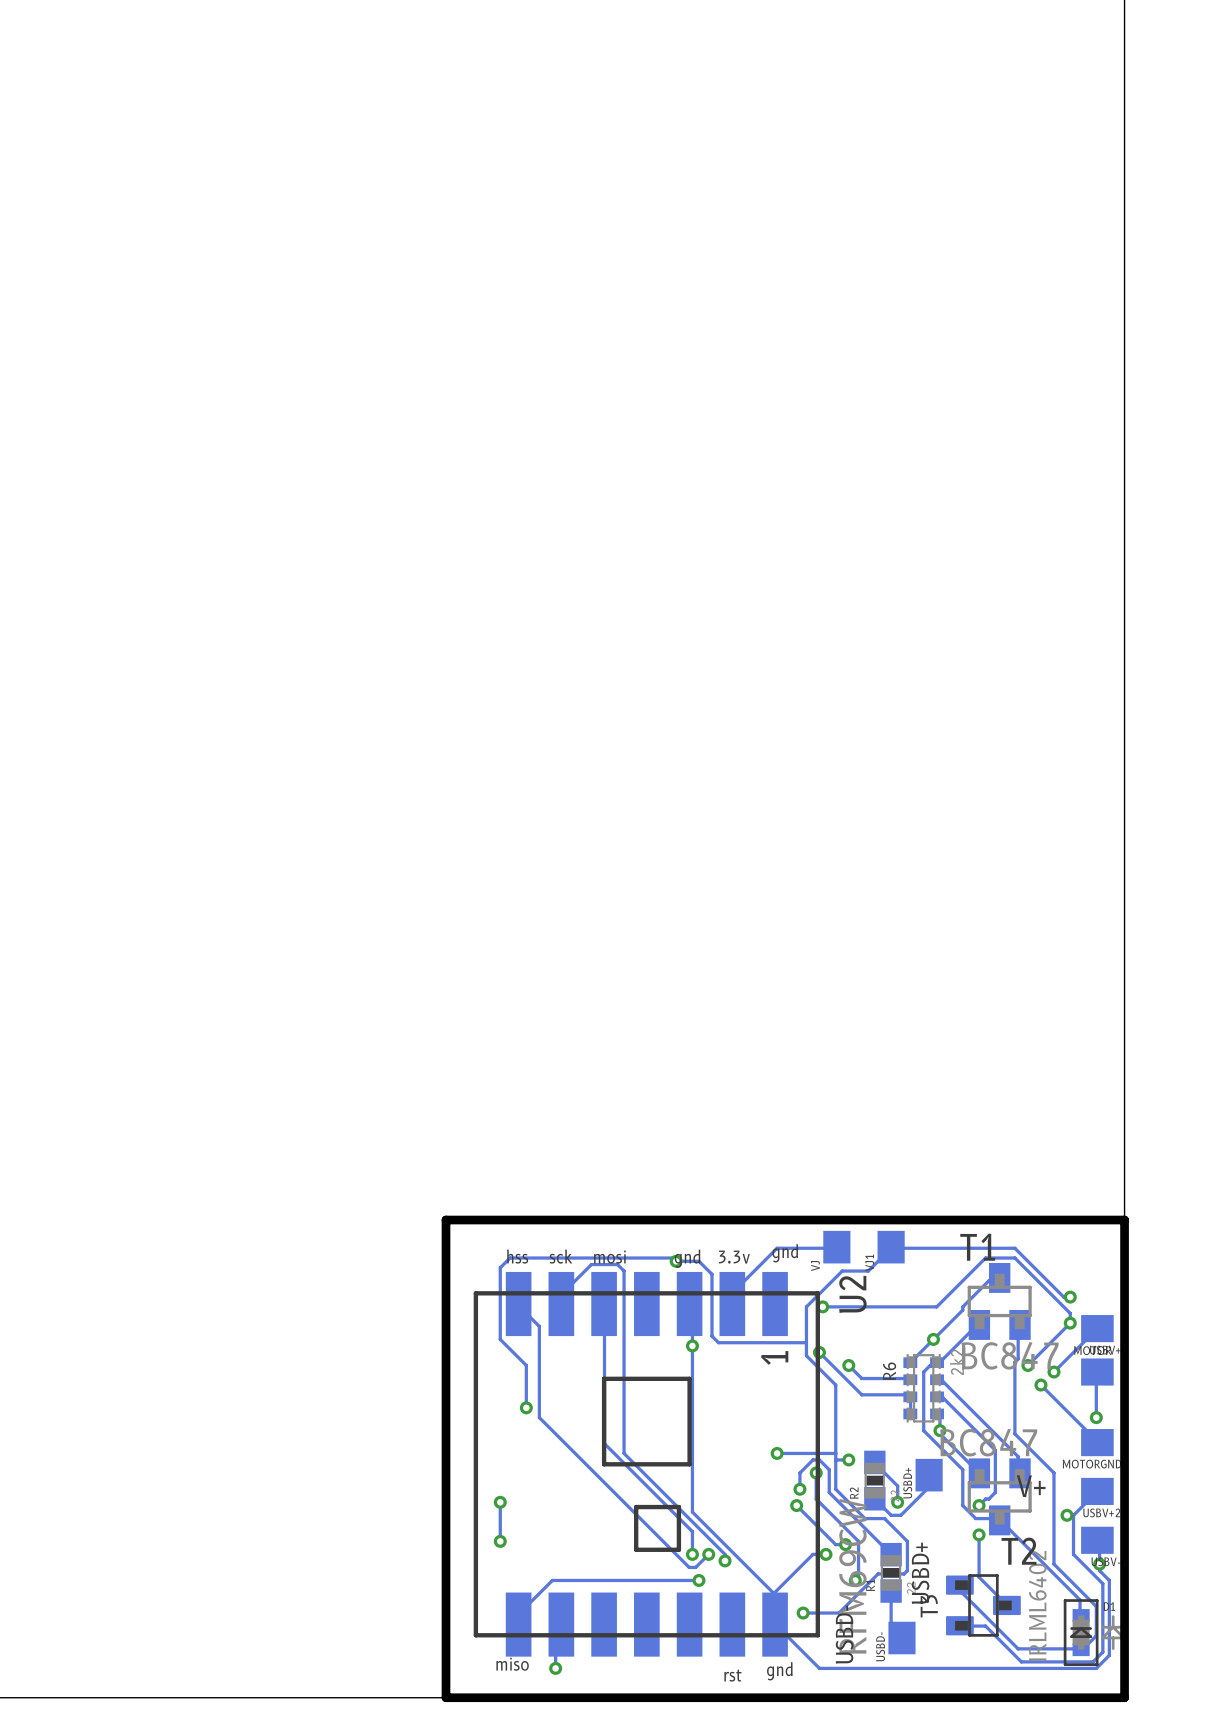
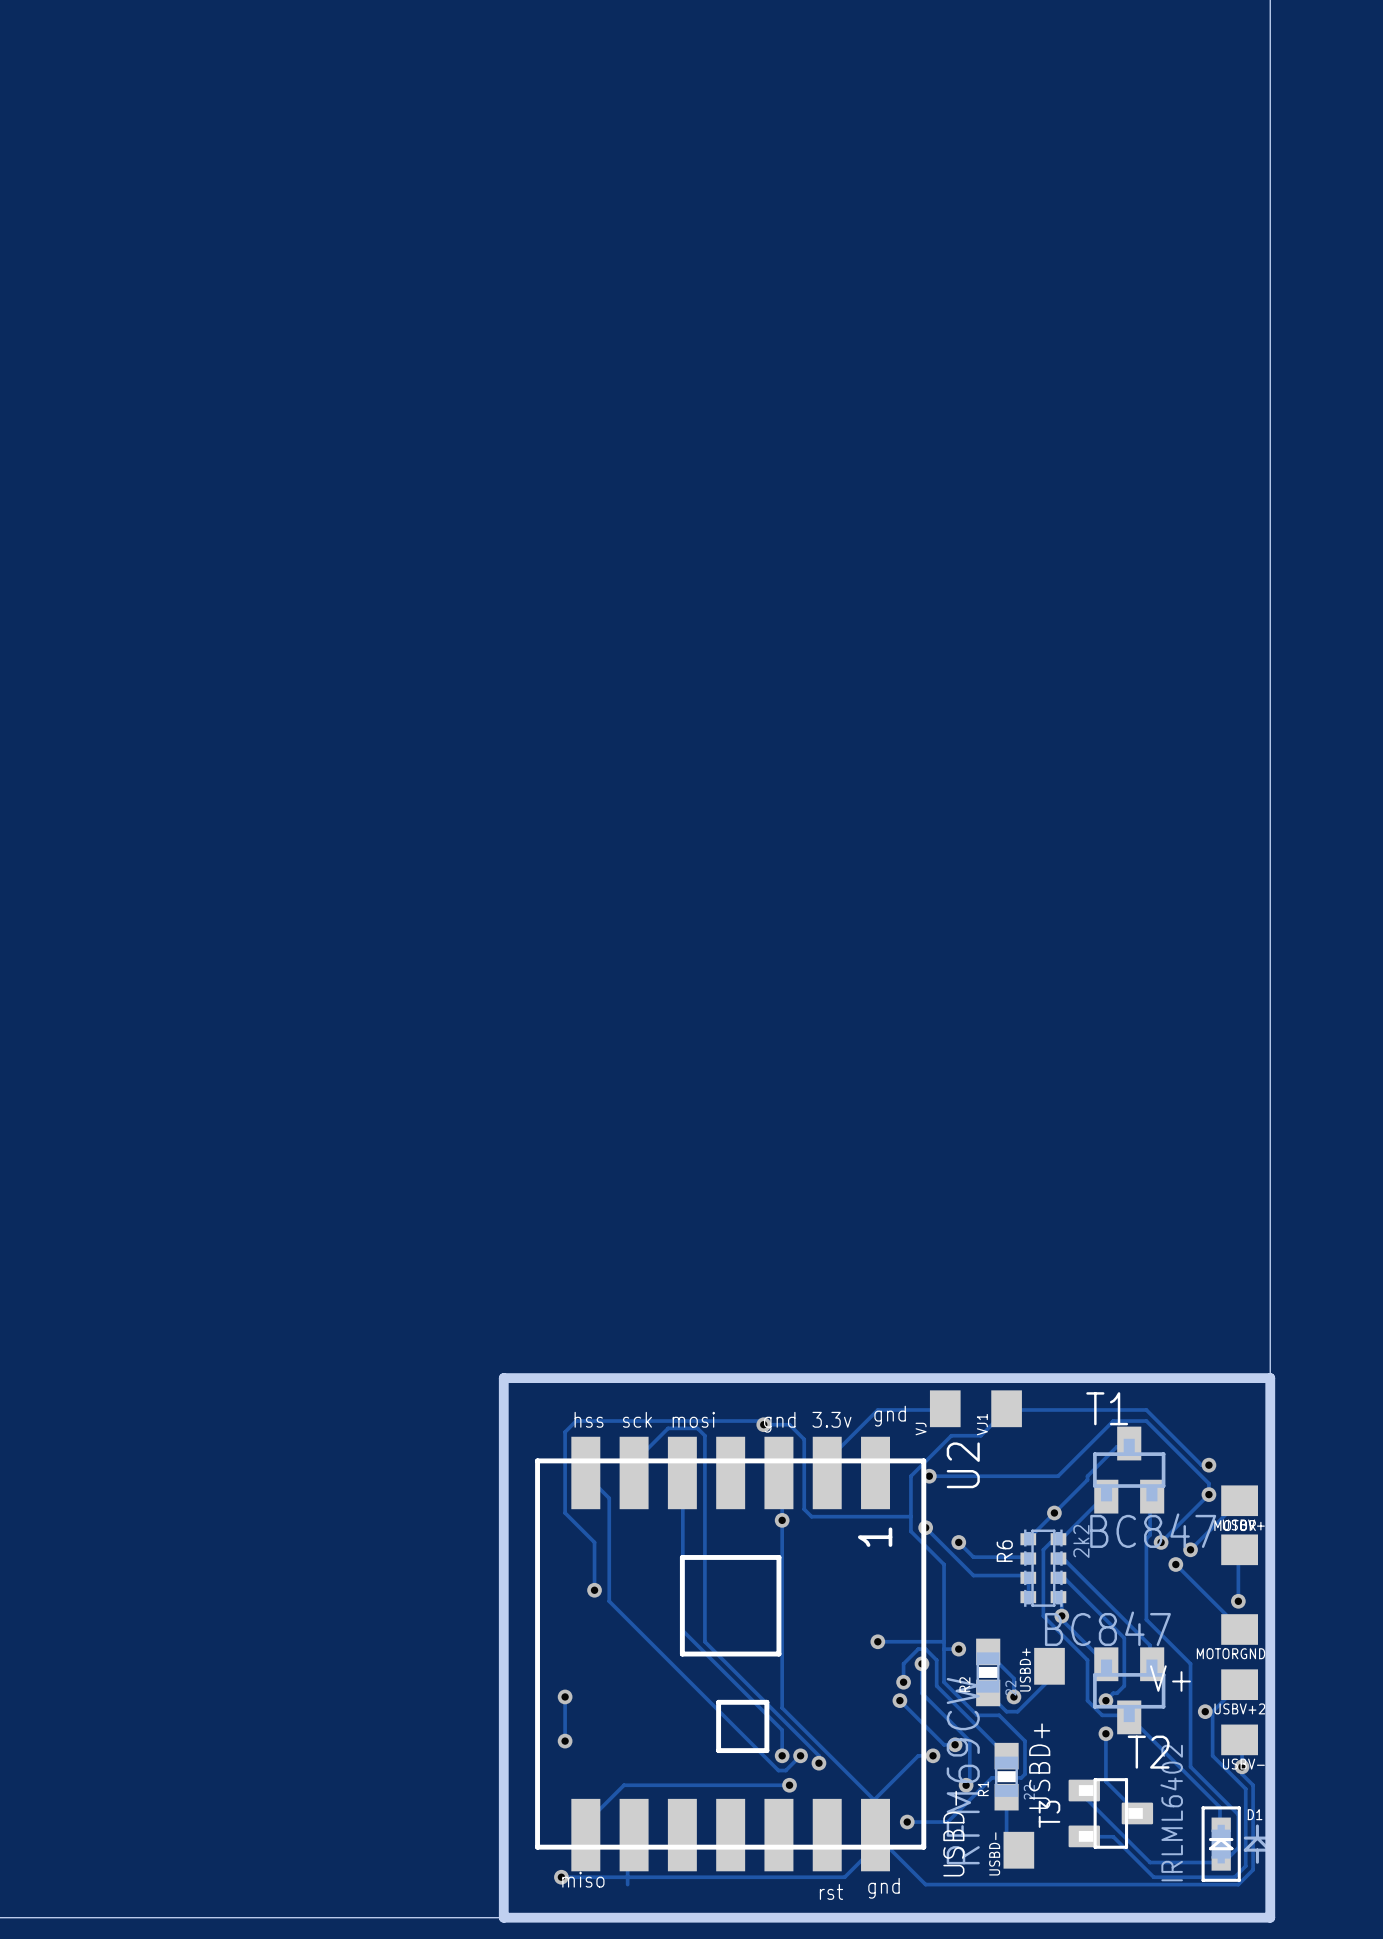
track: none -> (875, 1835) (881, 1840) (844, 1877) (561, 1877)
via position: (555, 1668) -> (561, 1877)

